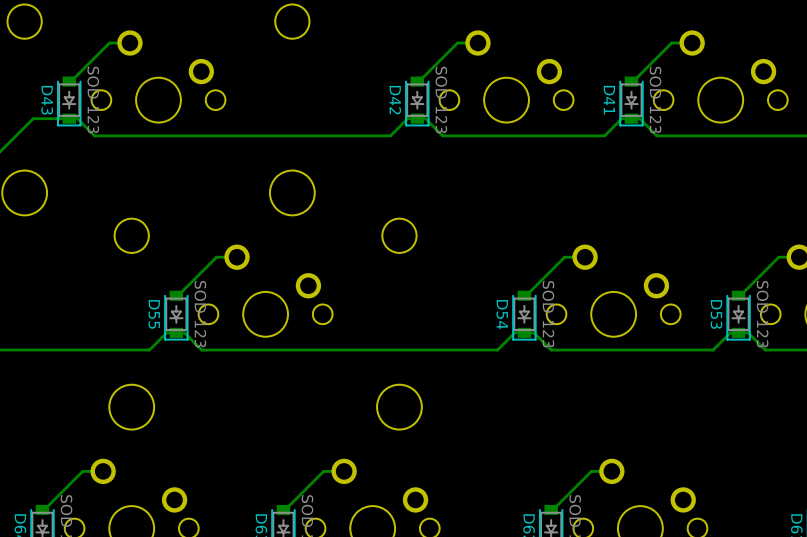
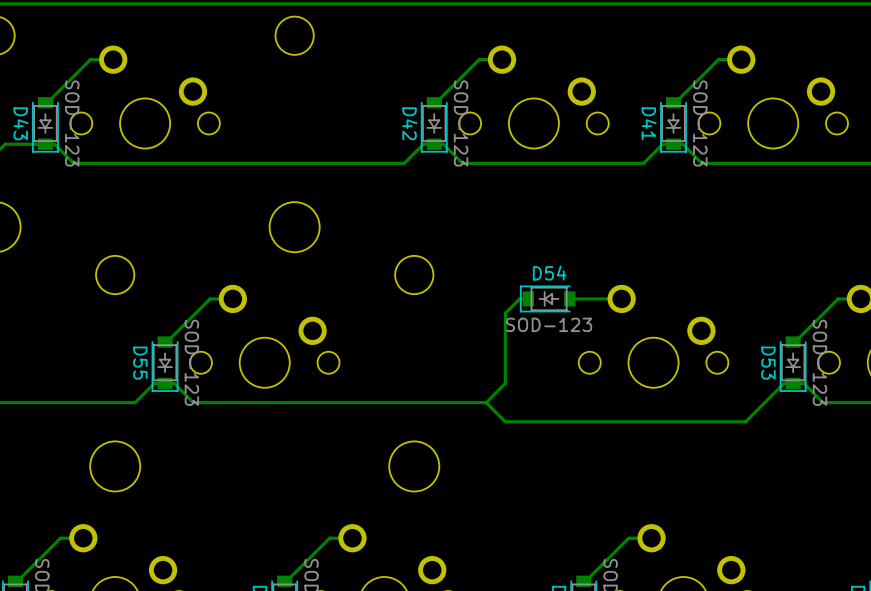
track: (564, 257) (524, 295) -> (598, 298) (569, 298)
D54 rotation: 0° (524, 315) -> 90° clockwise (547, 298)
D54 position: (524, 315) -> (547, 298)
track: (713, 350) (551, 350) (534, 332) (514, 332) (497, 350) (463, 350) -> (764, 402) (745, 421) (505, 421) (486, 402) (505, 383) (505, 313) (519, 298) (529, 298)

